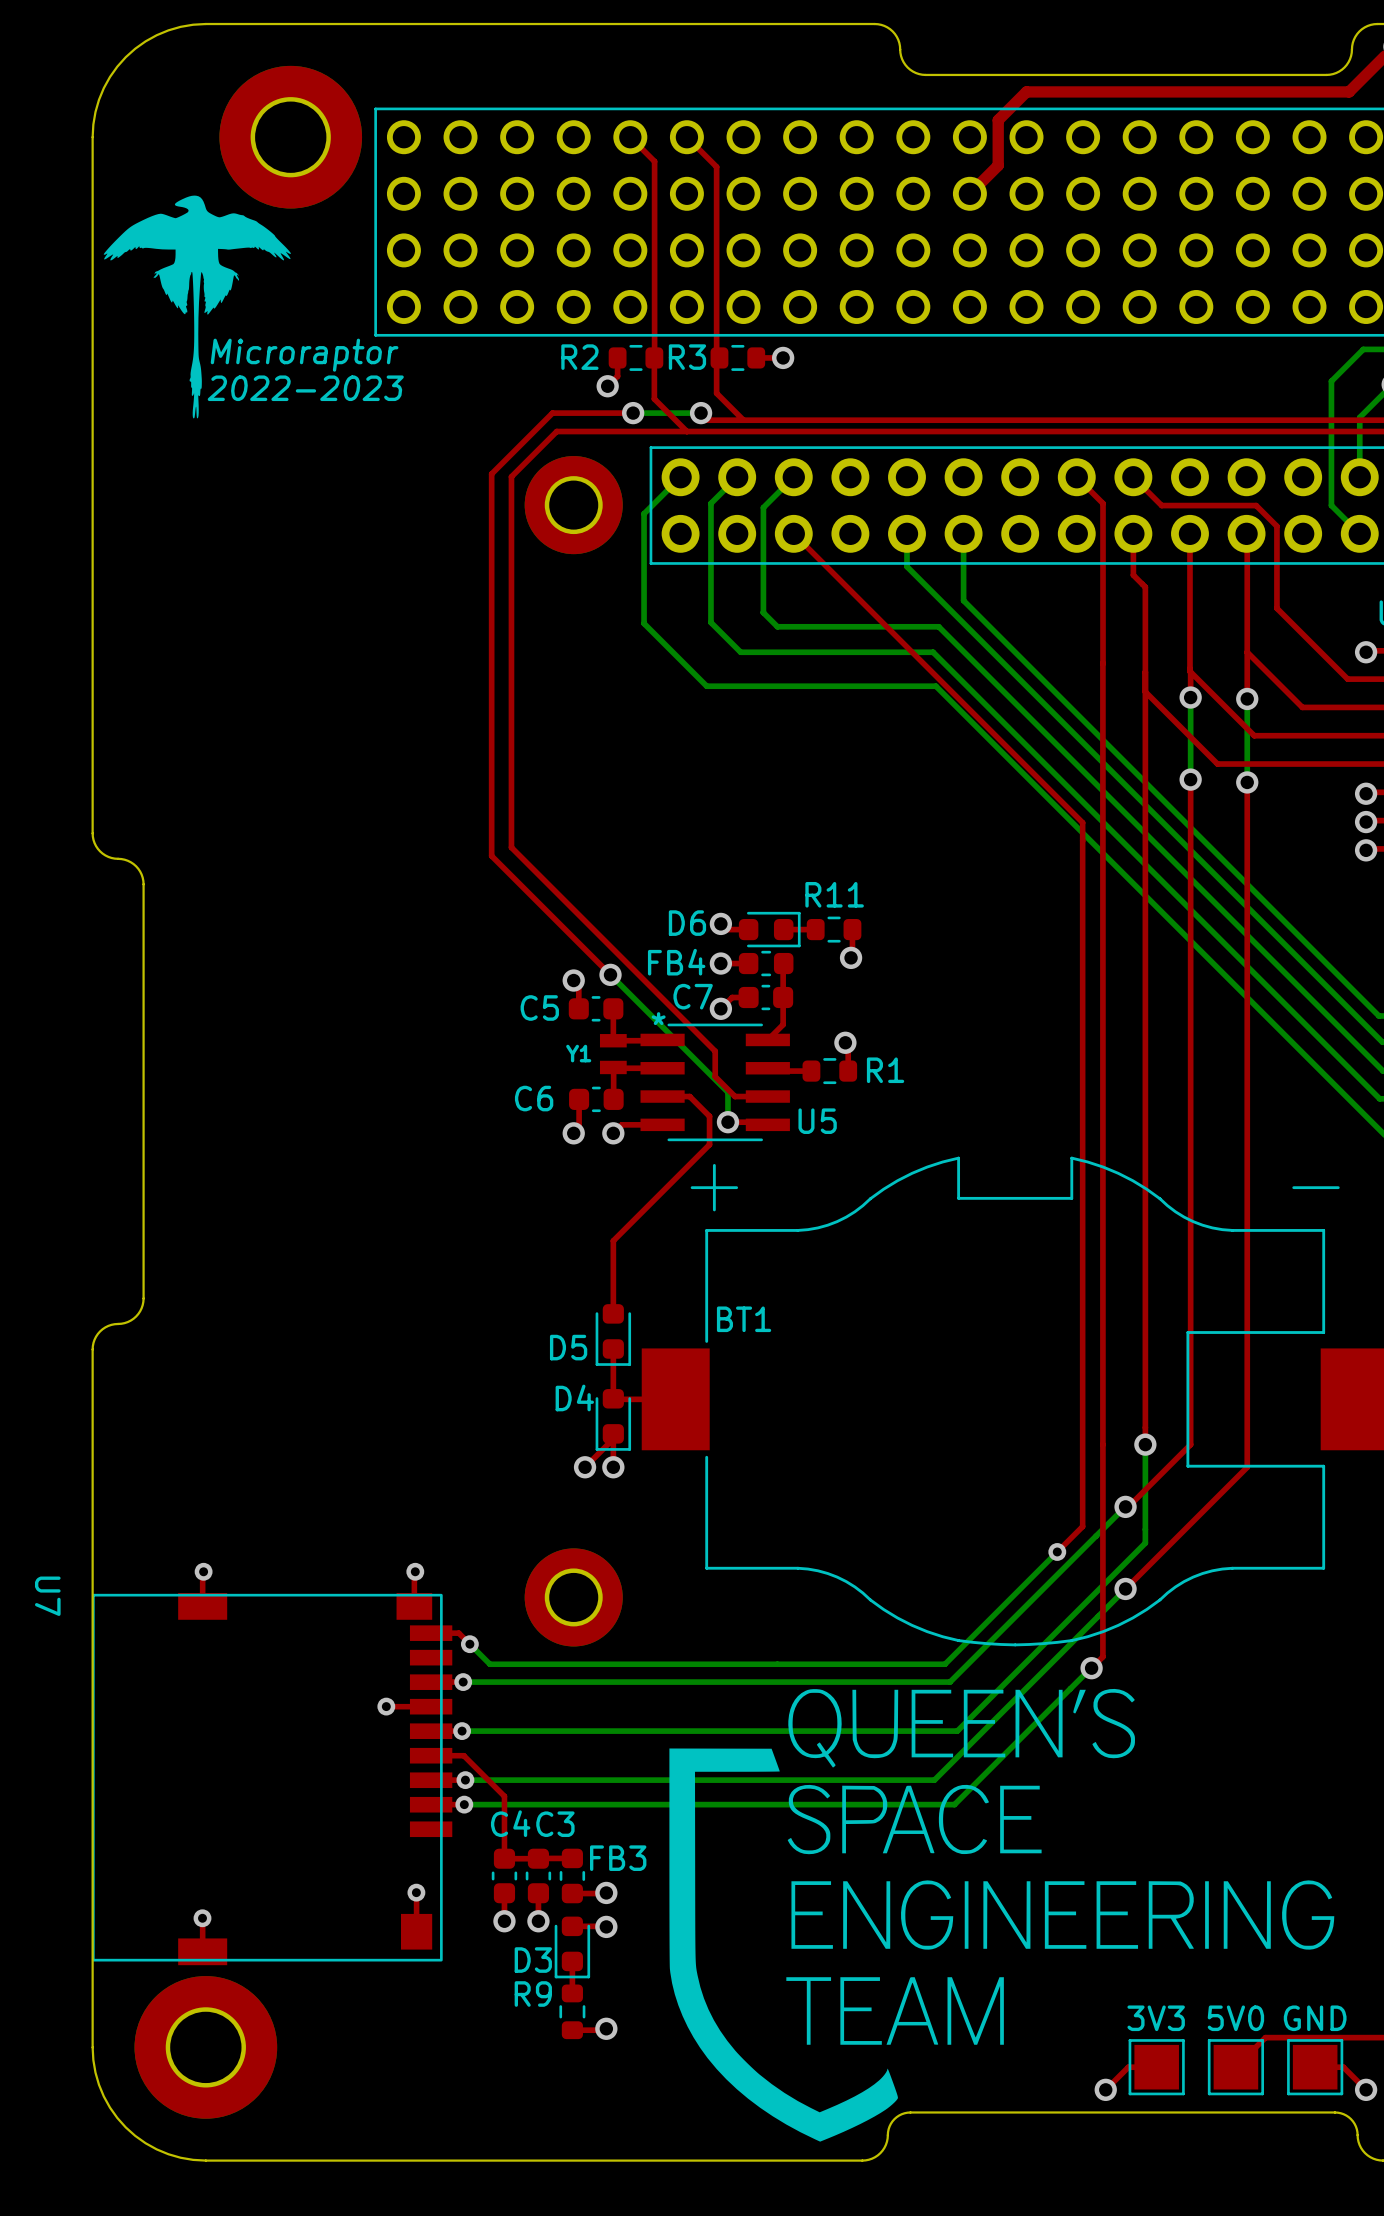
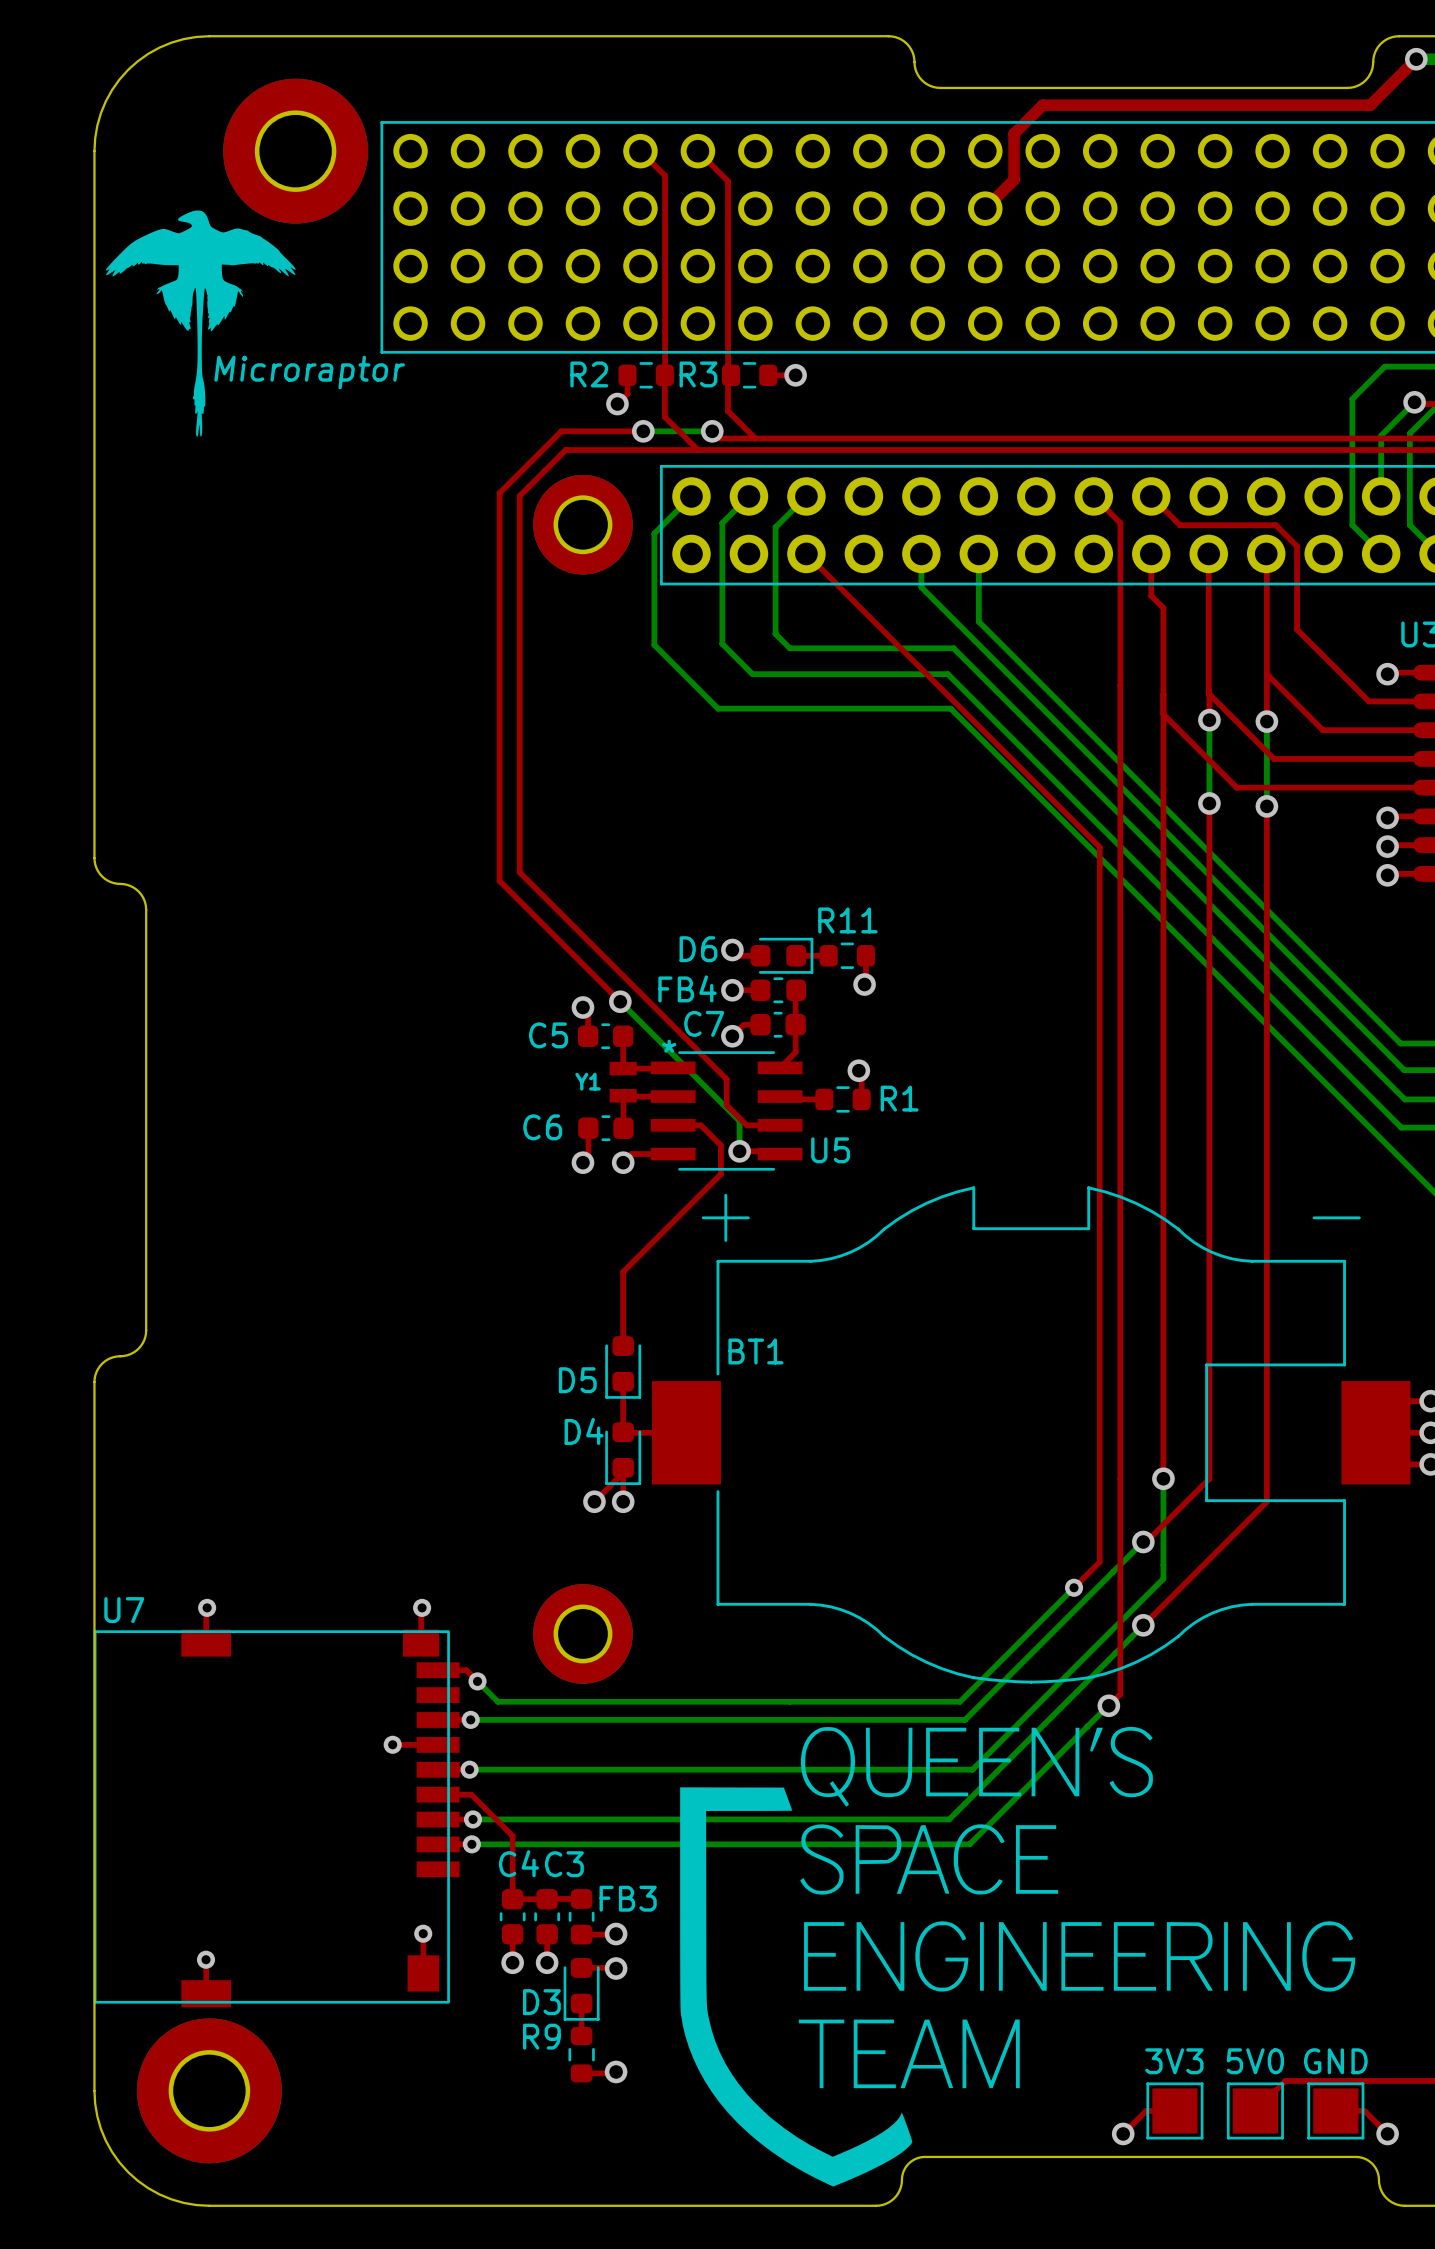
text: 2022-2023 (305, 388) -> none
U7 name rotation: 0° (47, 1596) -> 90° counterclockwise (124, 1610)
U7 name position: U7 (47, 1596) -> U7 (124, 1610)

